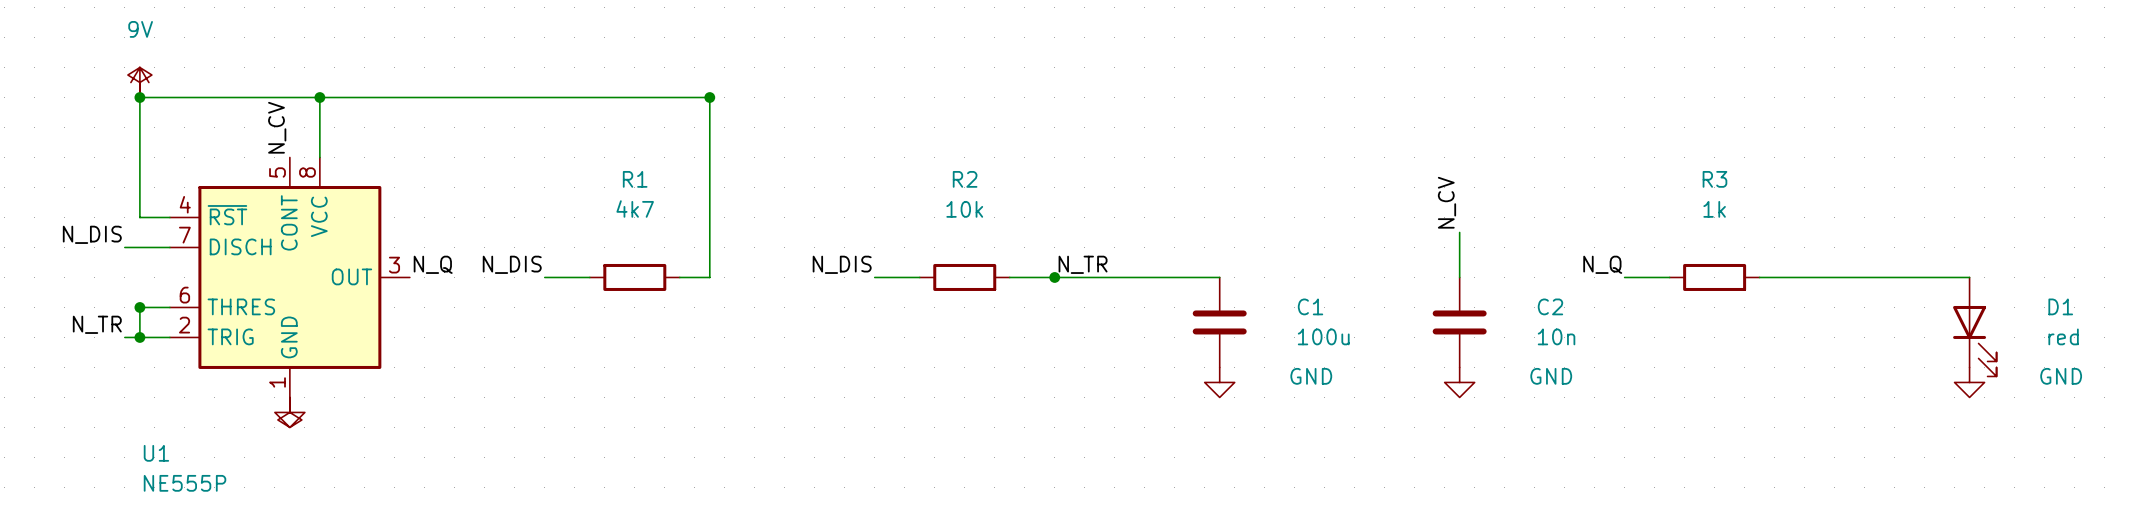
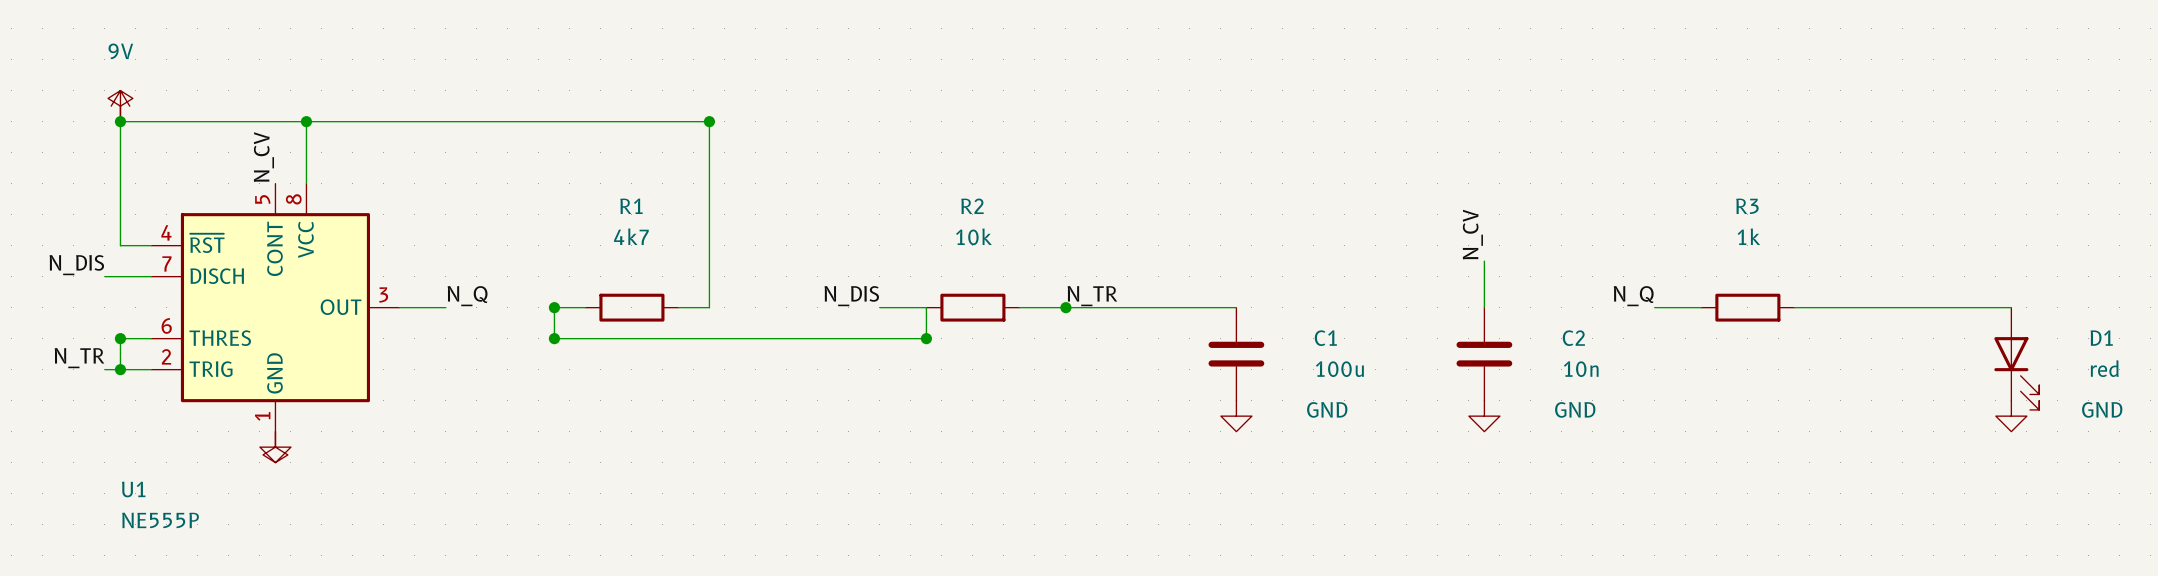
label position: N_Q (433, 264) -> N_Q (467, 296)
label: N_DIS (512, 264) -> none
wire: none -> (399, 307) (445, 307)
wire: (544, 277) (559, 277) -> (926, 307) (926, 338) (554, 338) (554, 307)
junction: none -> (554, 307)
junction: none -> (554, 338)
junction: none -> (926, 338)

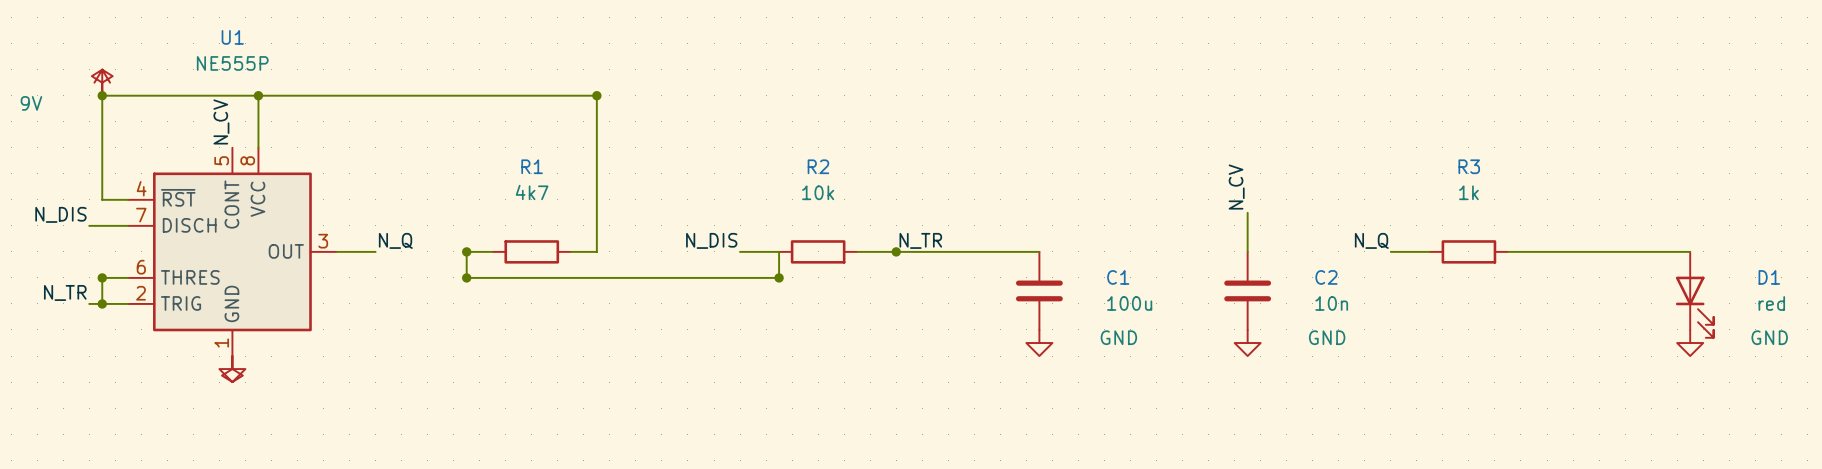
power symbol text position: 9V (120, 51) -> 9V (31, 103)
U1 name position: U1 (133, 489) -> U1 (232, 37)
U1 value position: NE555P (160, 520) -> NE555P (232, 63)

